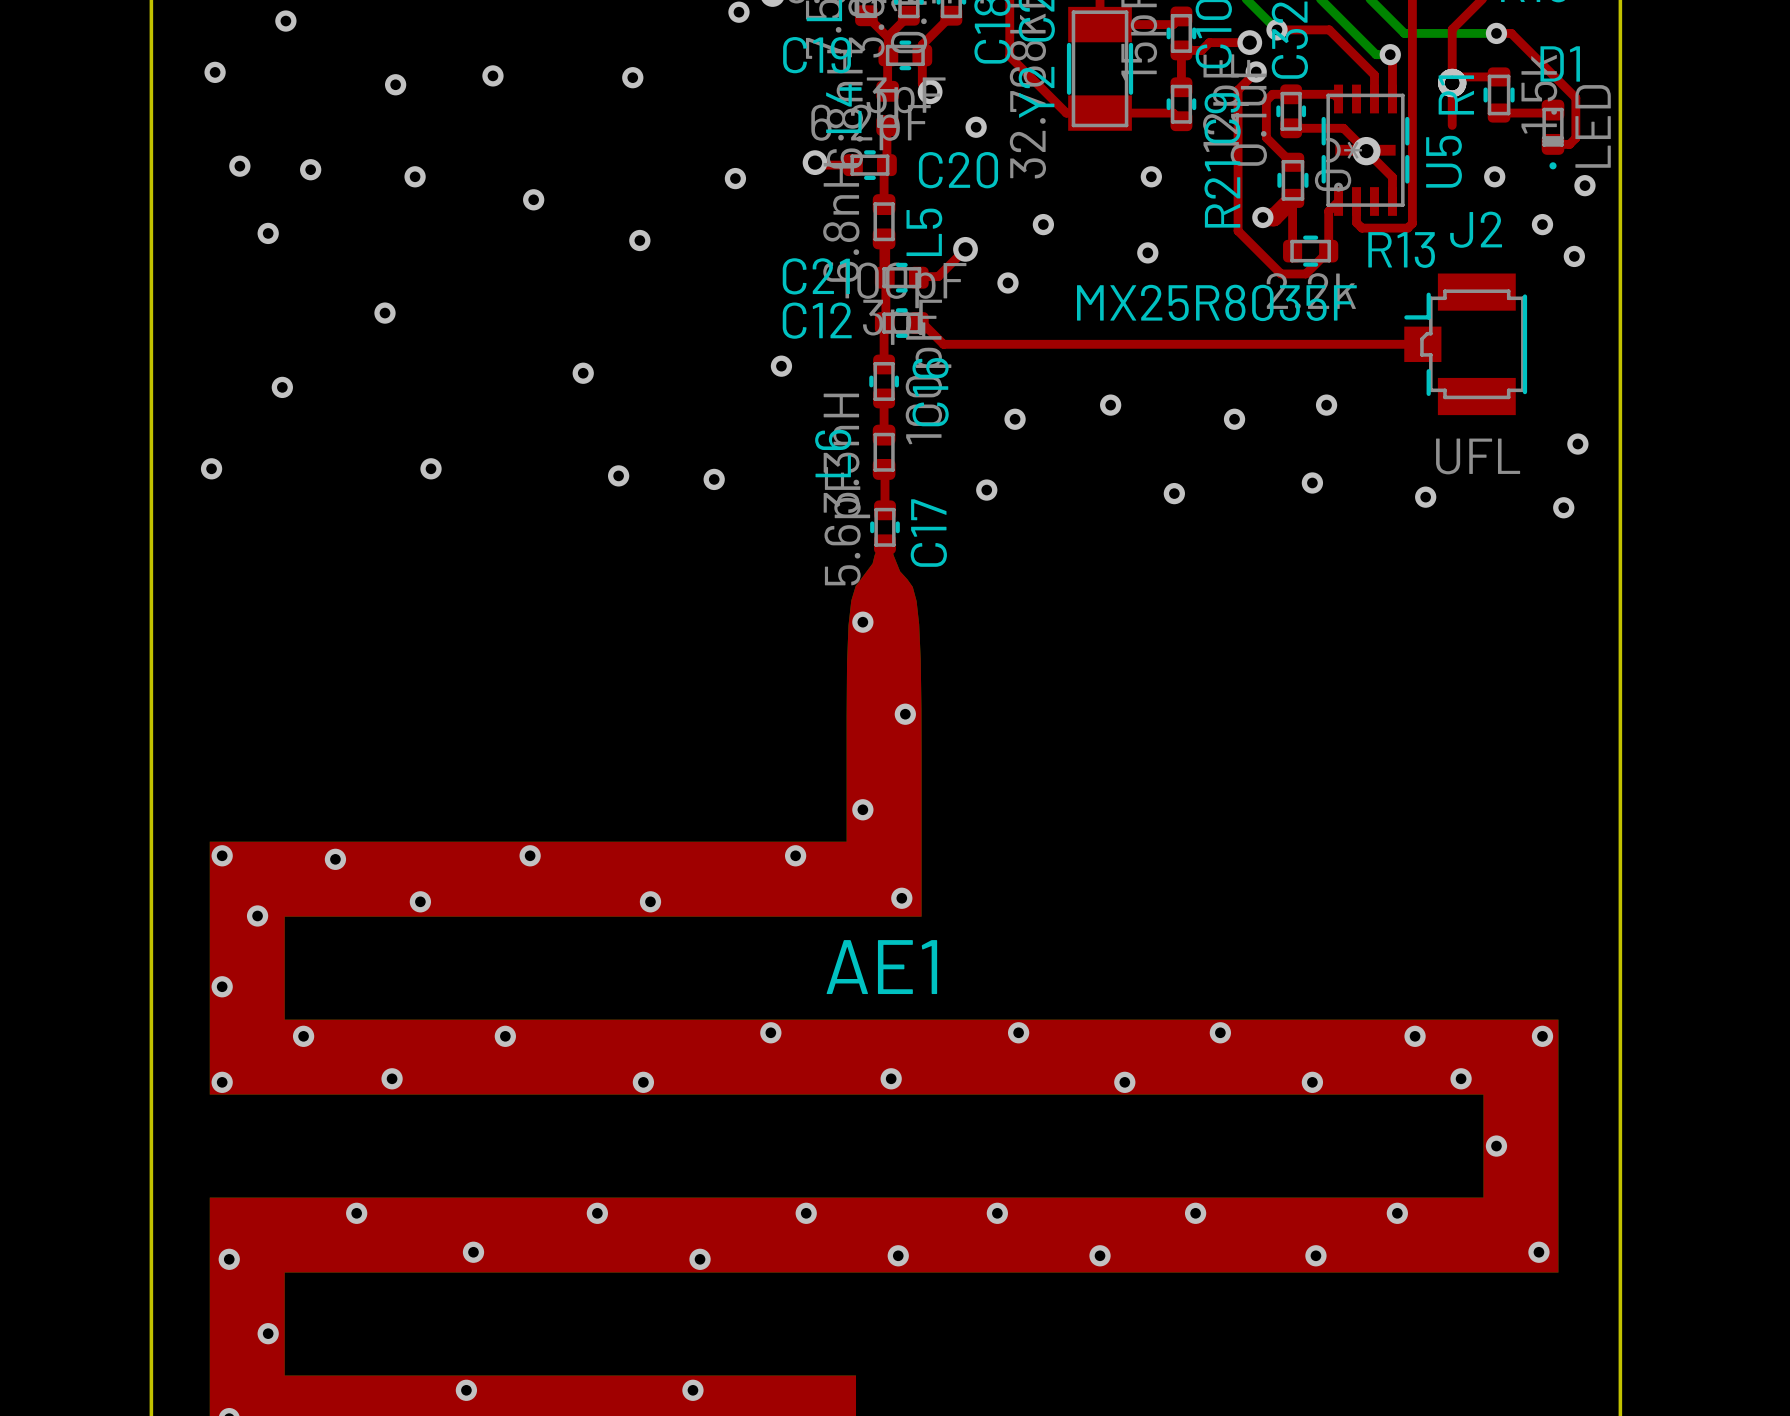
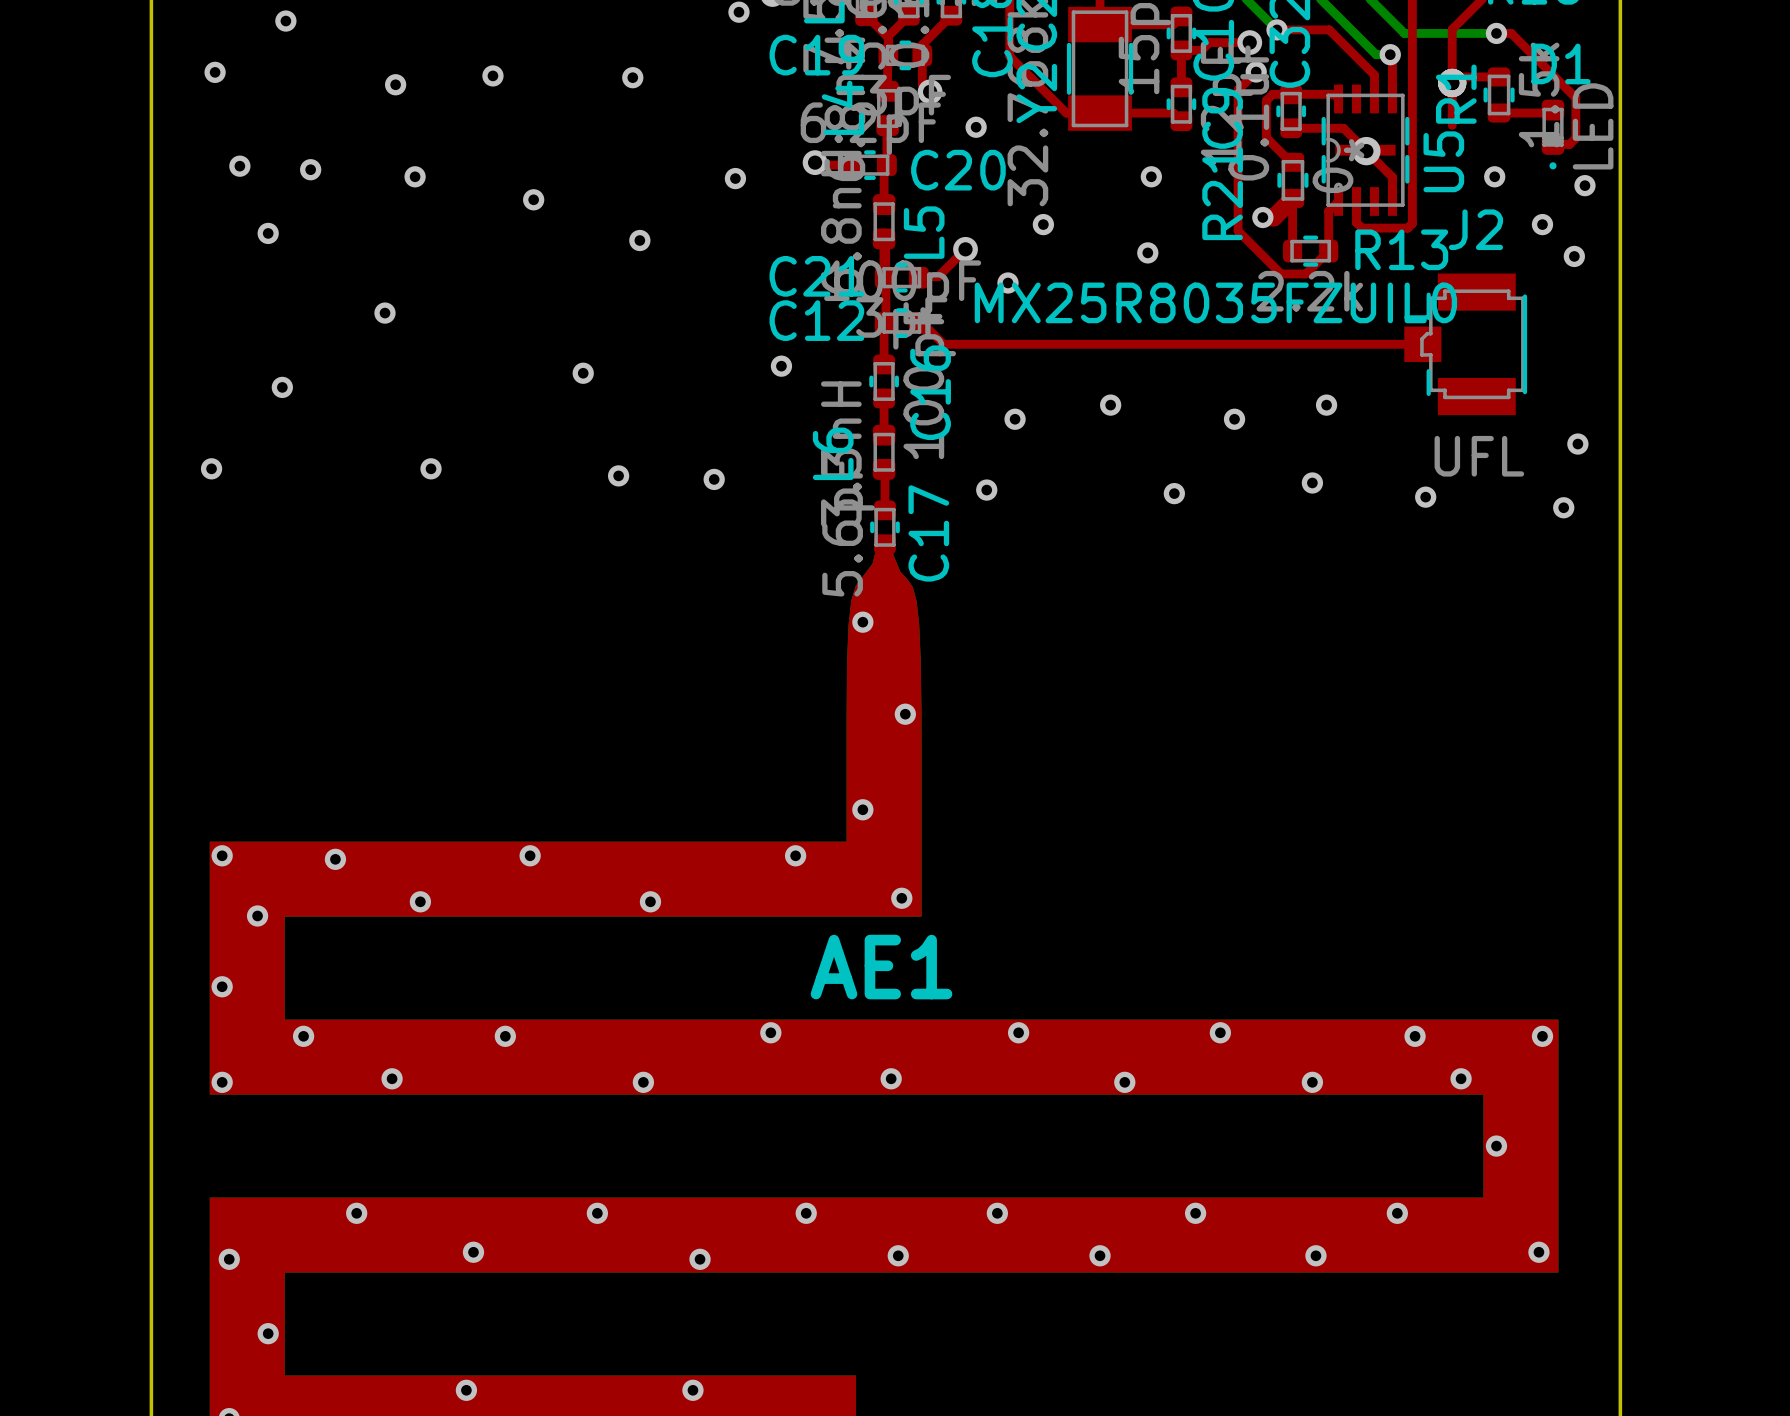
U5 value: MX25R8035F (1216, 302) -> MX25R8035FZUIL0 (1215, 302)

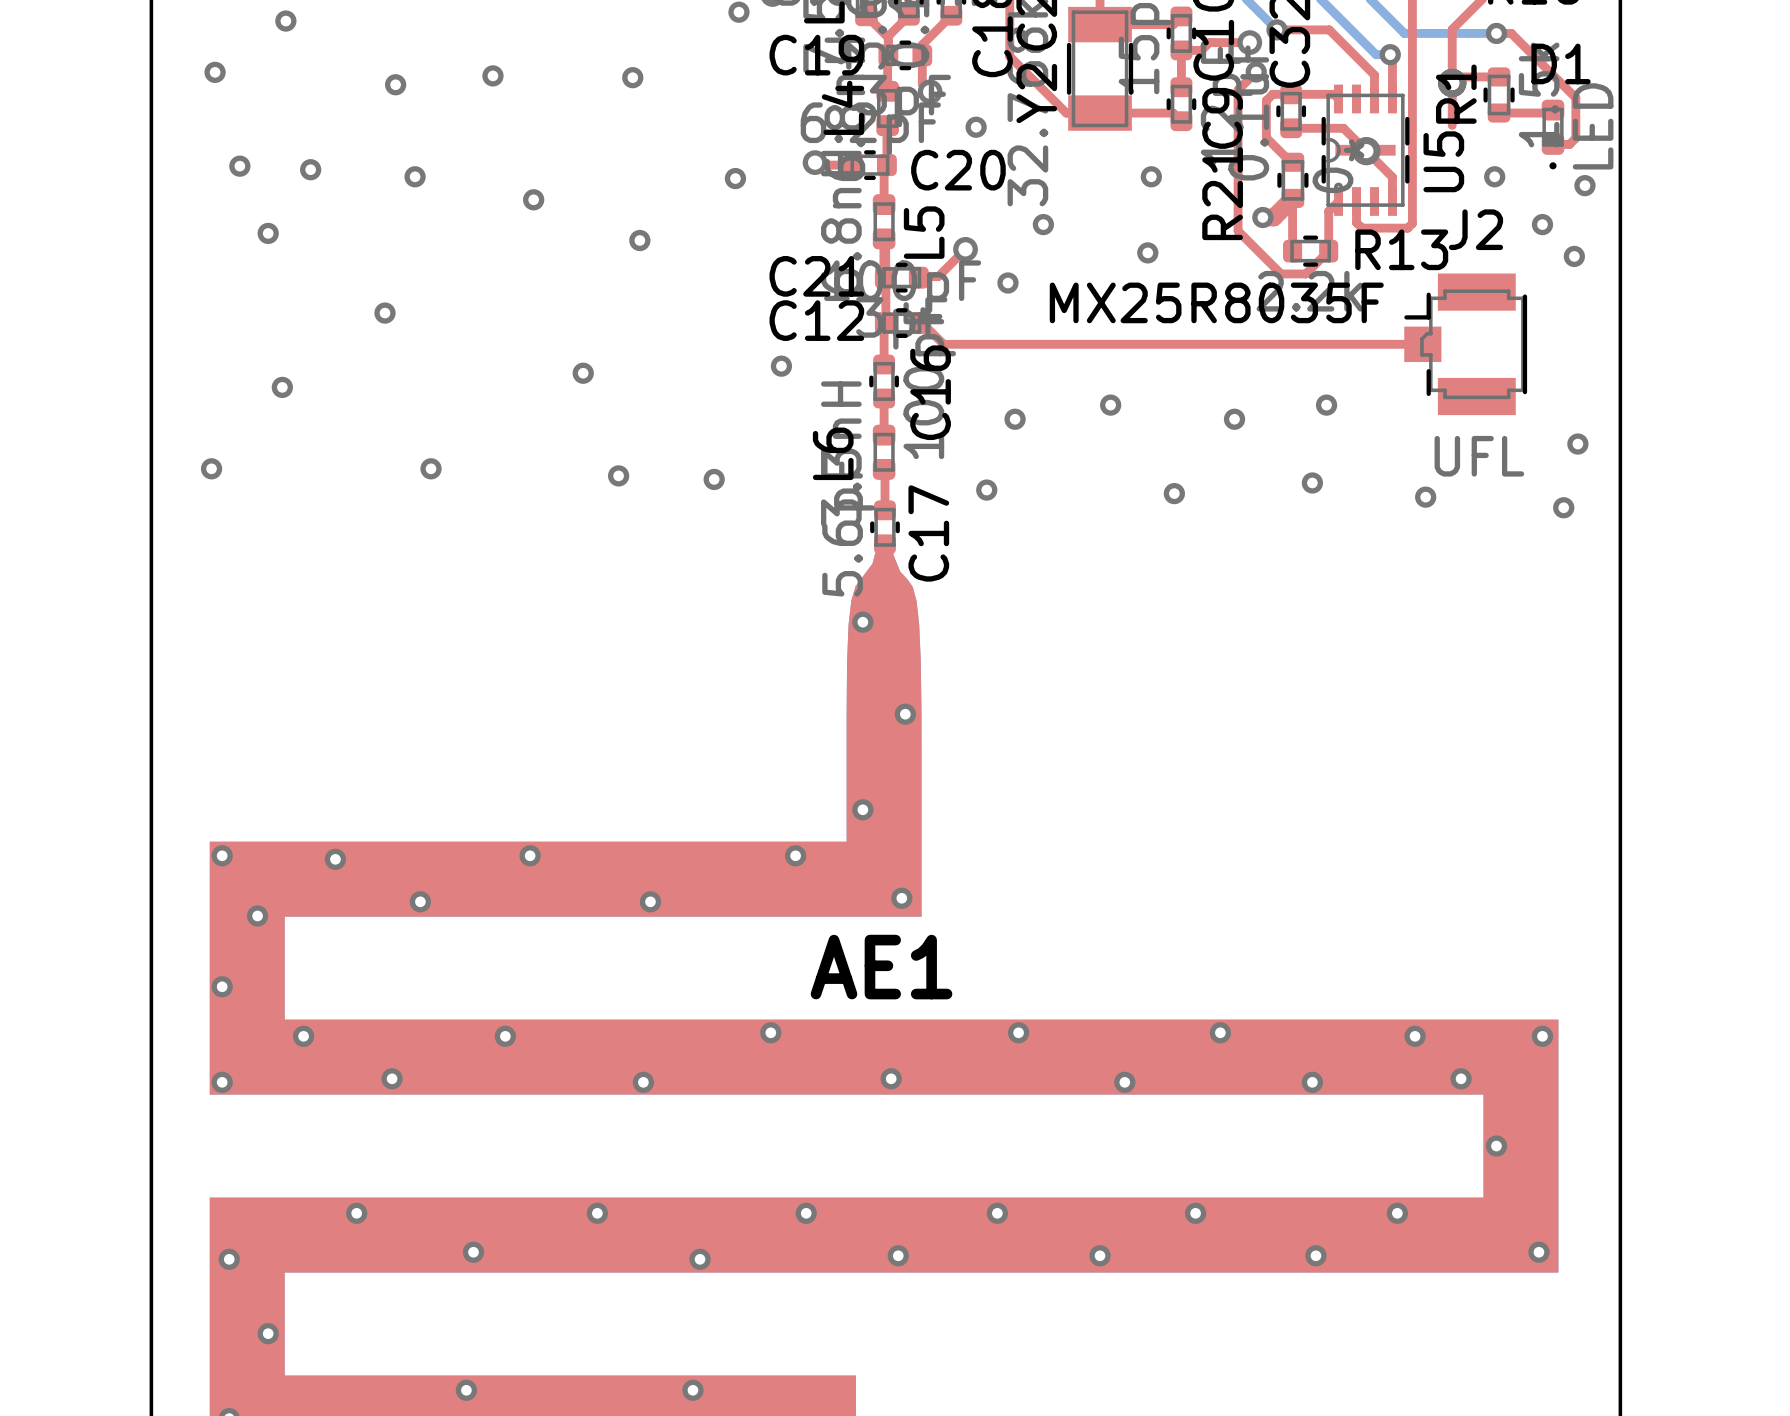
U5 value: MX25R8035FZUIL0 (1215, 302) -> MX25R8035F (1216, 302)

